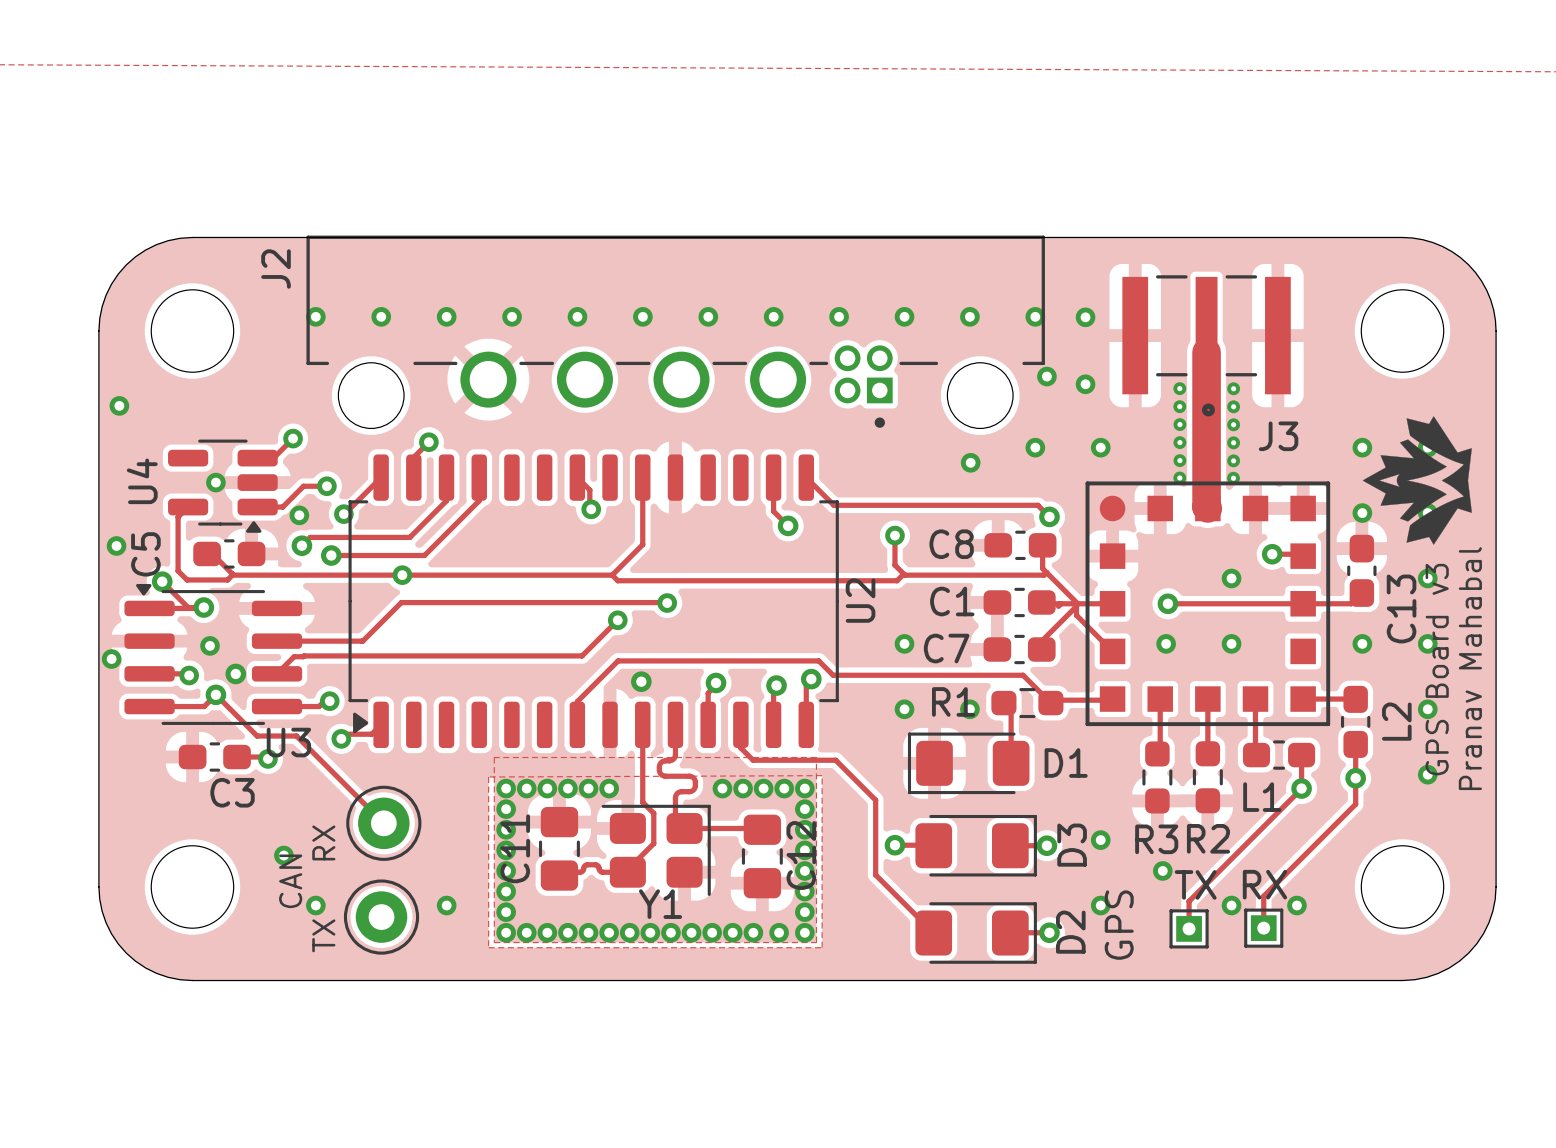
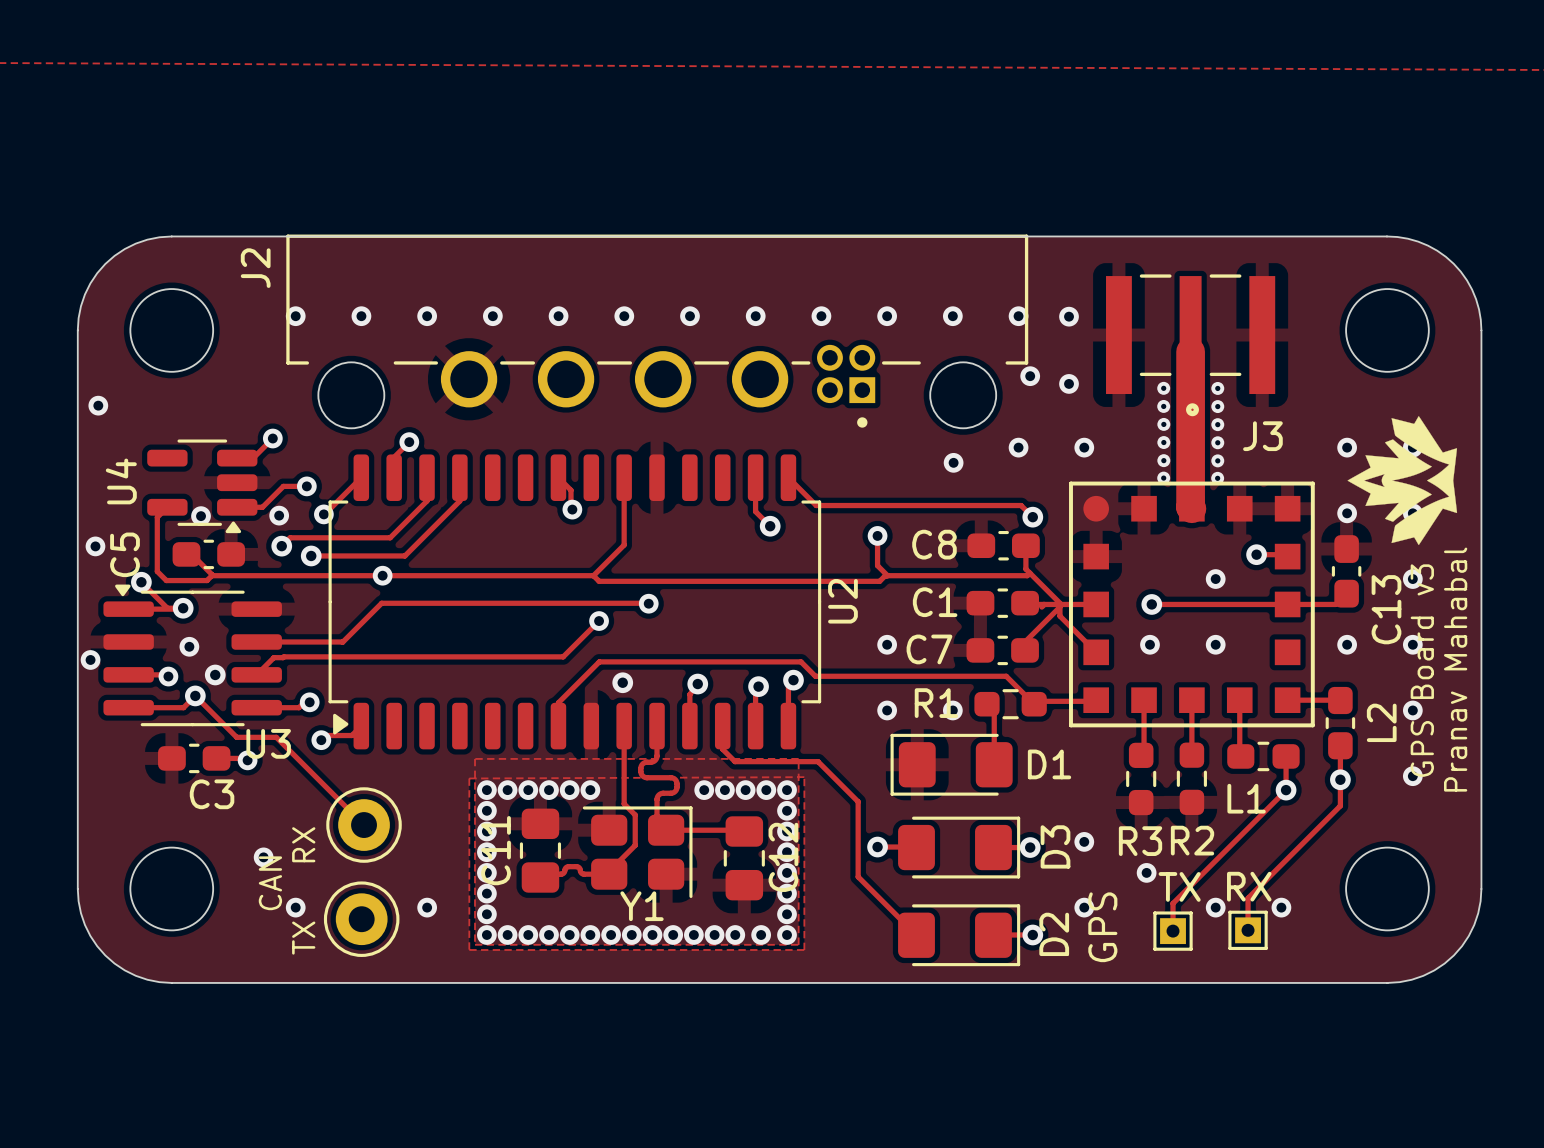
via position: (215, 482) -> (201, 516)

